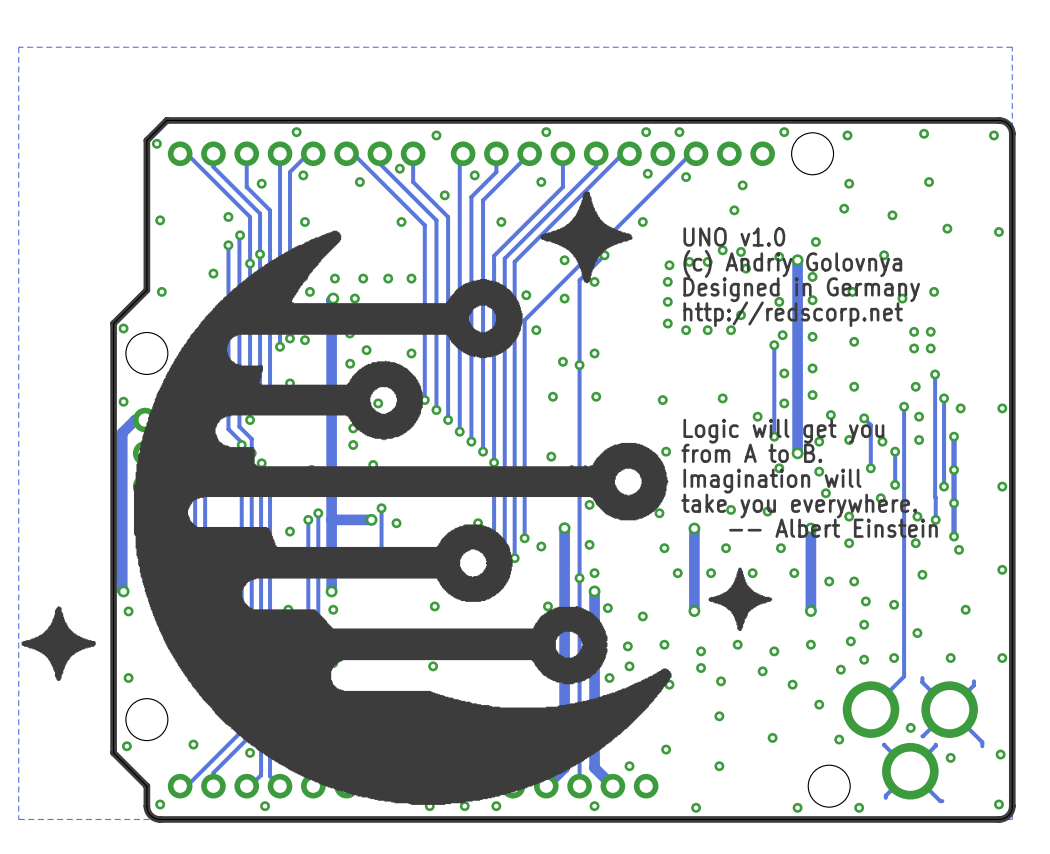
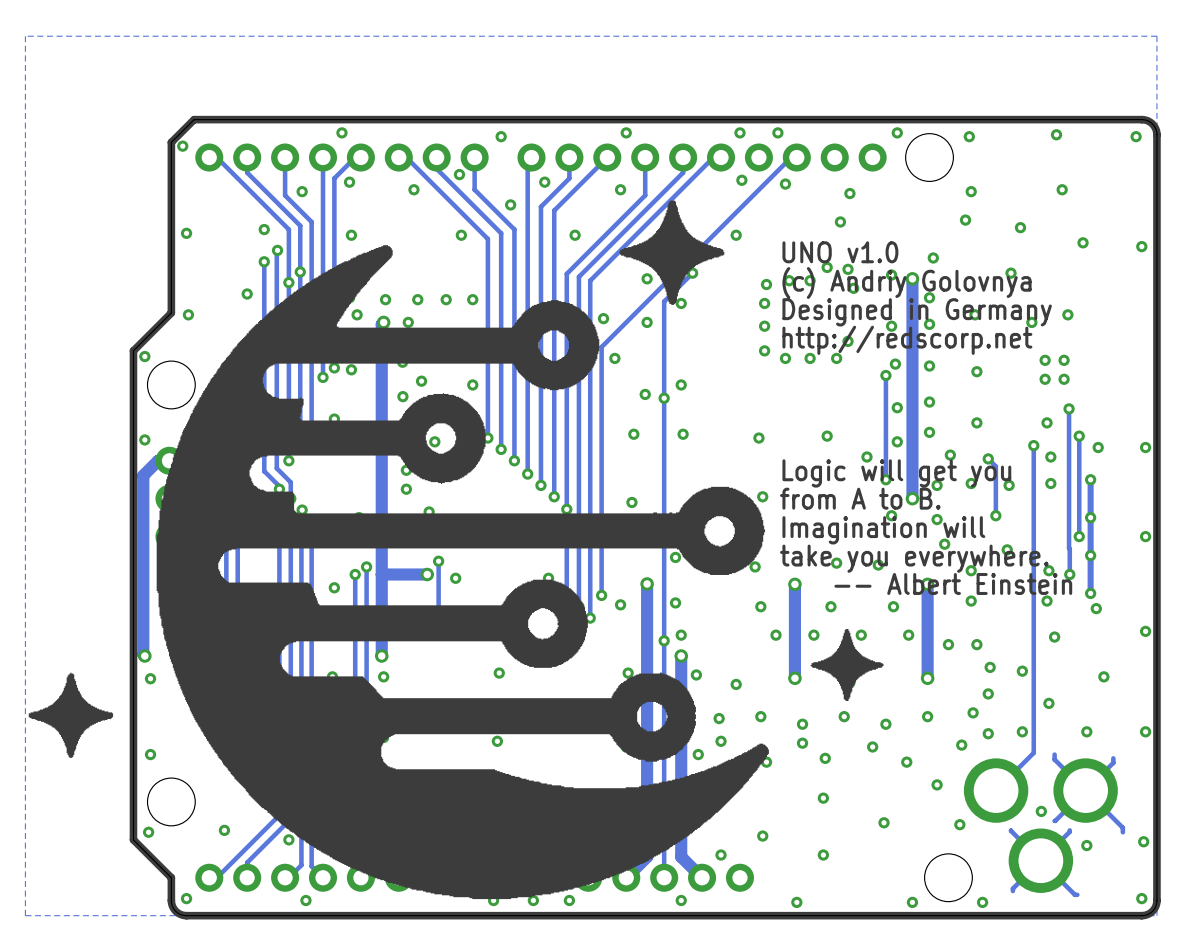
track: (895, 451) (895, 484) -> none
via: (895, 451) -> none
via: (895, 484) -> none

